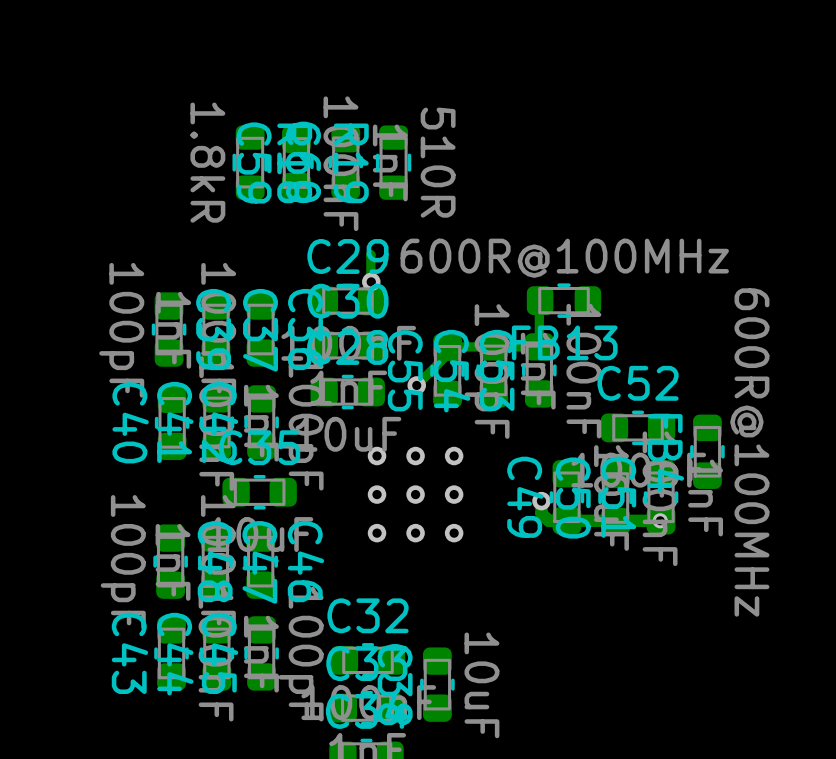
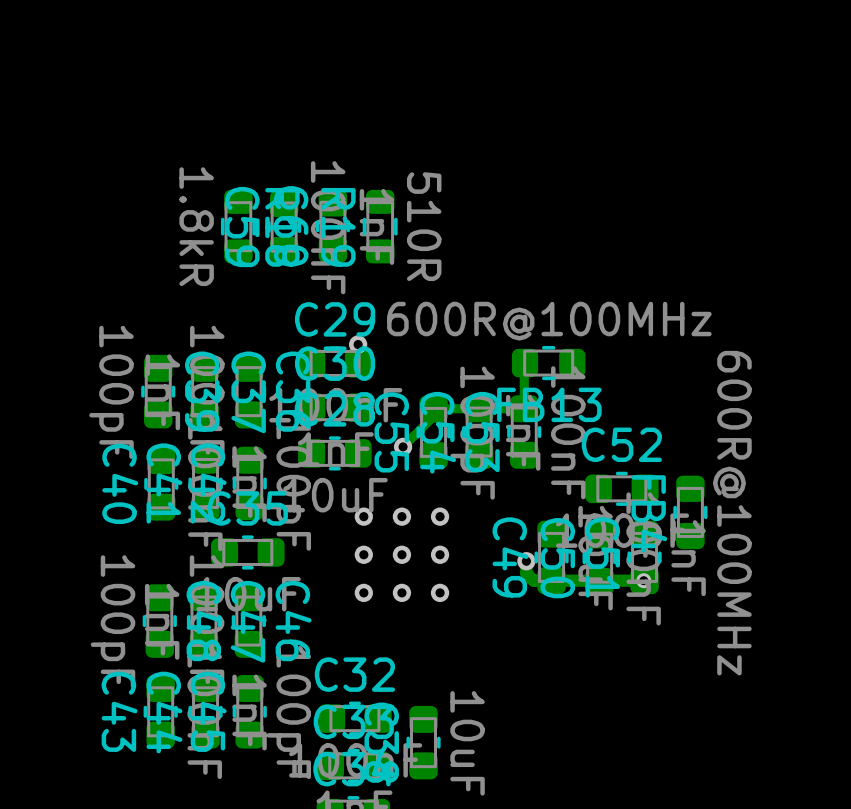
track: (370, 254) (369, 277) -> none

